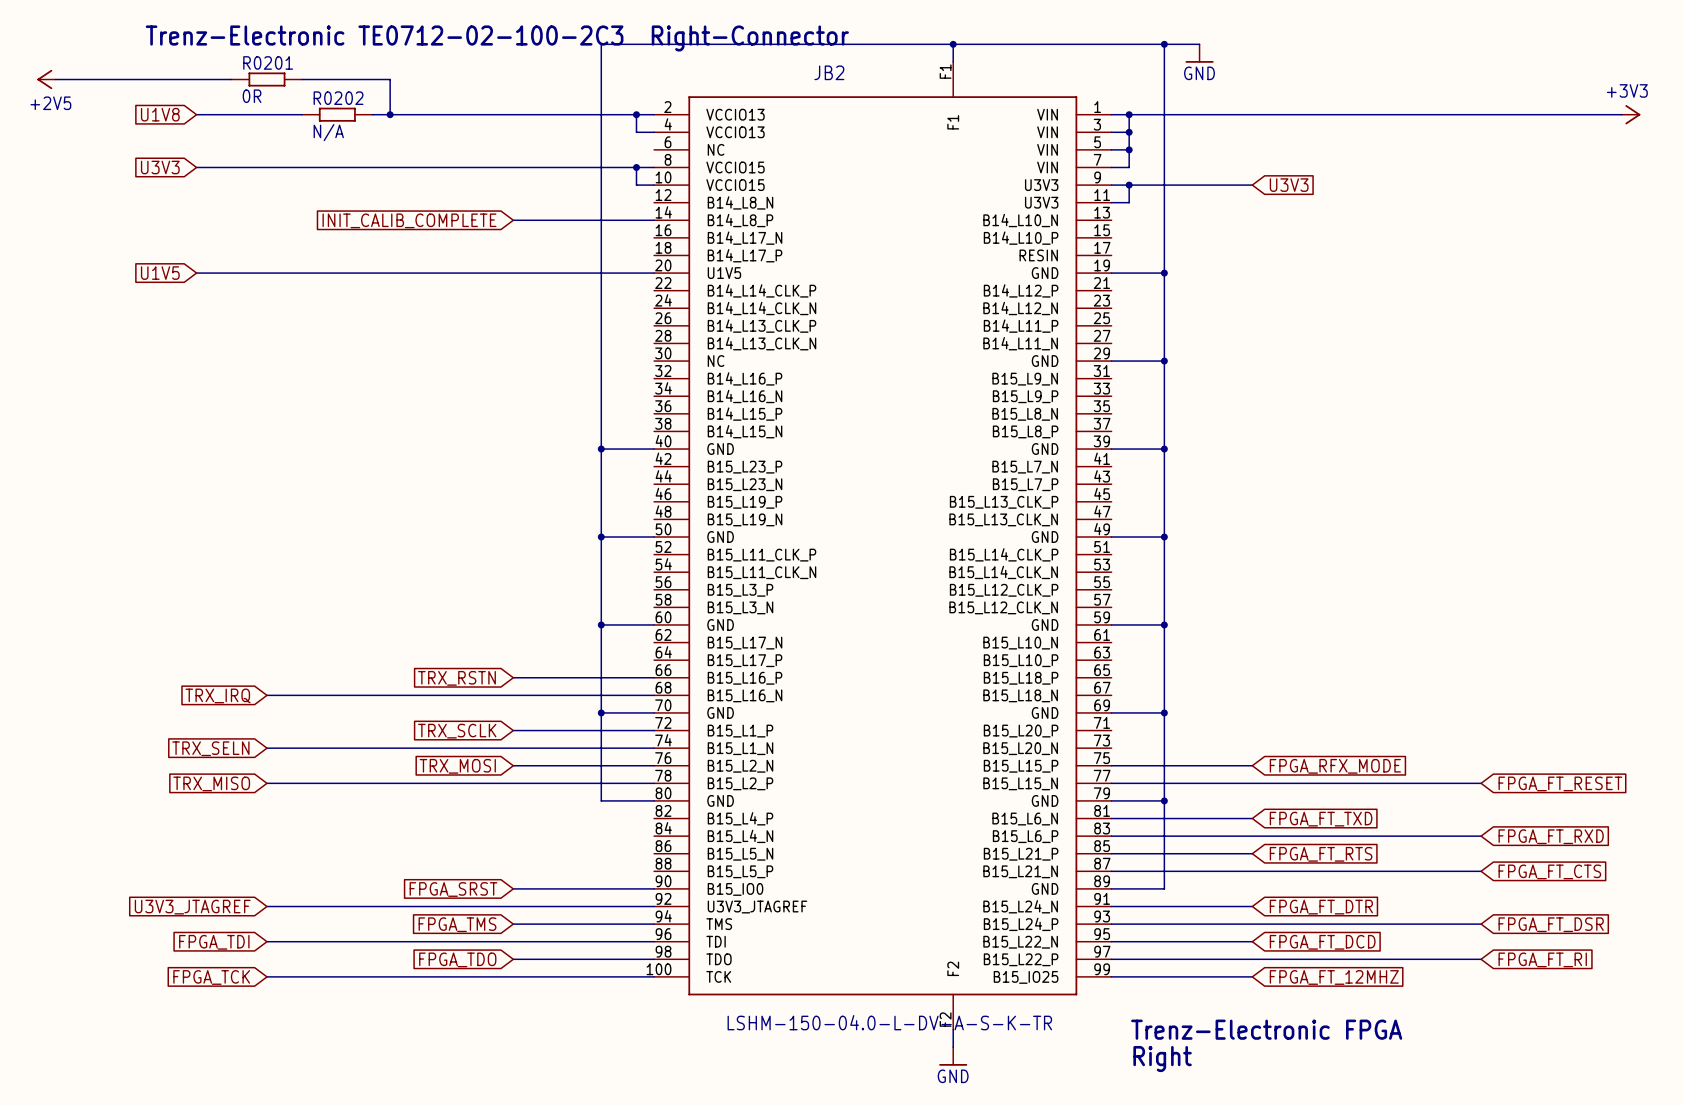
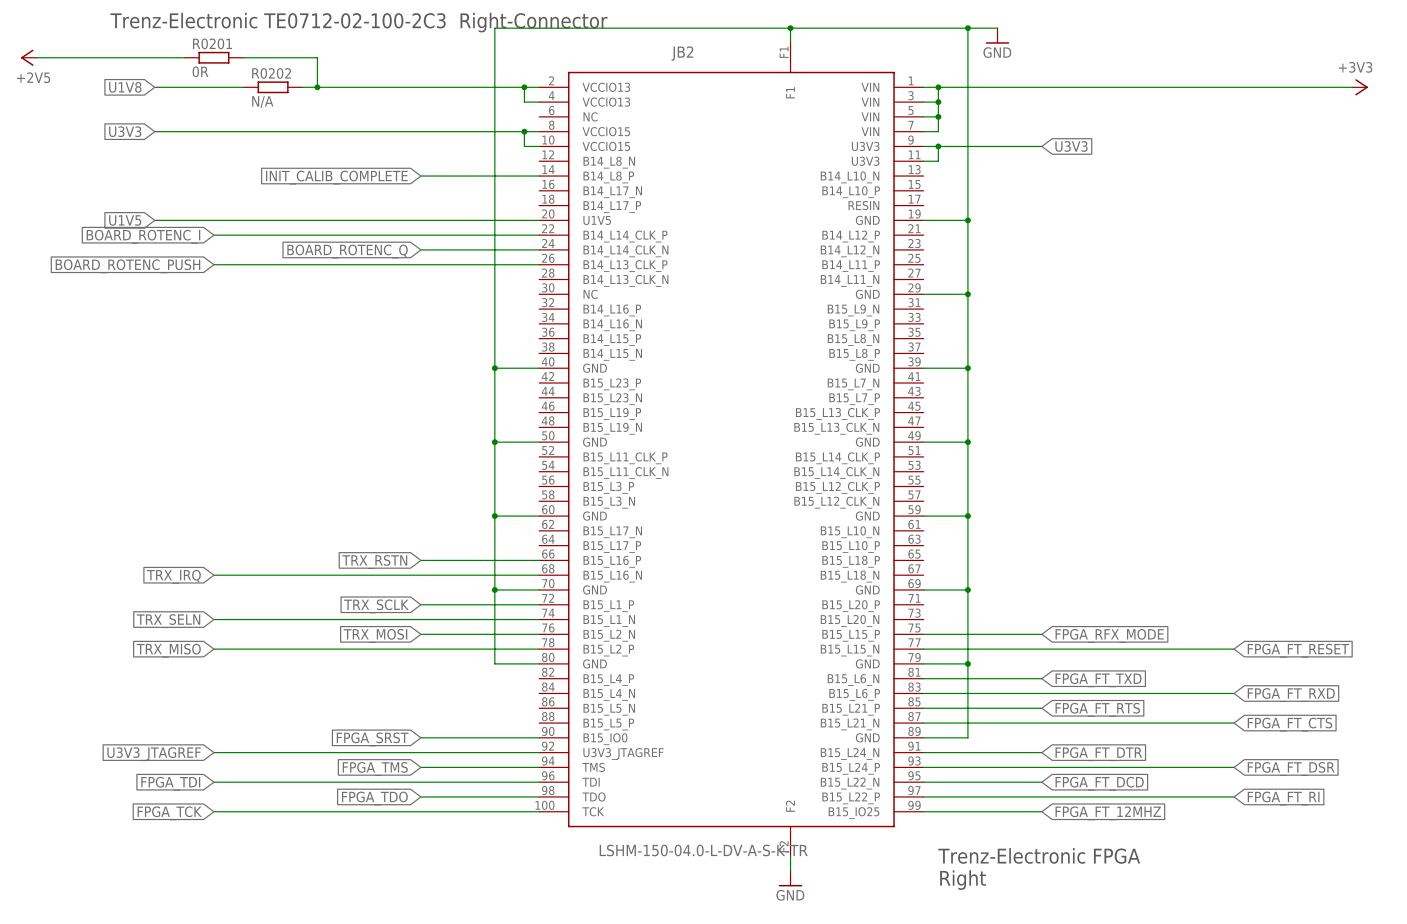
wire: none -> (213, 235) (539, 235)
global label: none -> BOARD_ROTENC_I (143, 236)
global label: none -> BOARD_ROTENC_Q (347, 251)
wire: none -> (420, 249) (539, 249)
wire: none -> (213, 264) (539, 264)
global label: none -> BOARD_ROTENC_PUSH (127, 266)

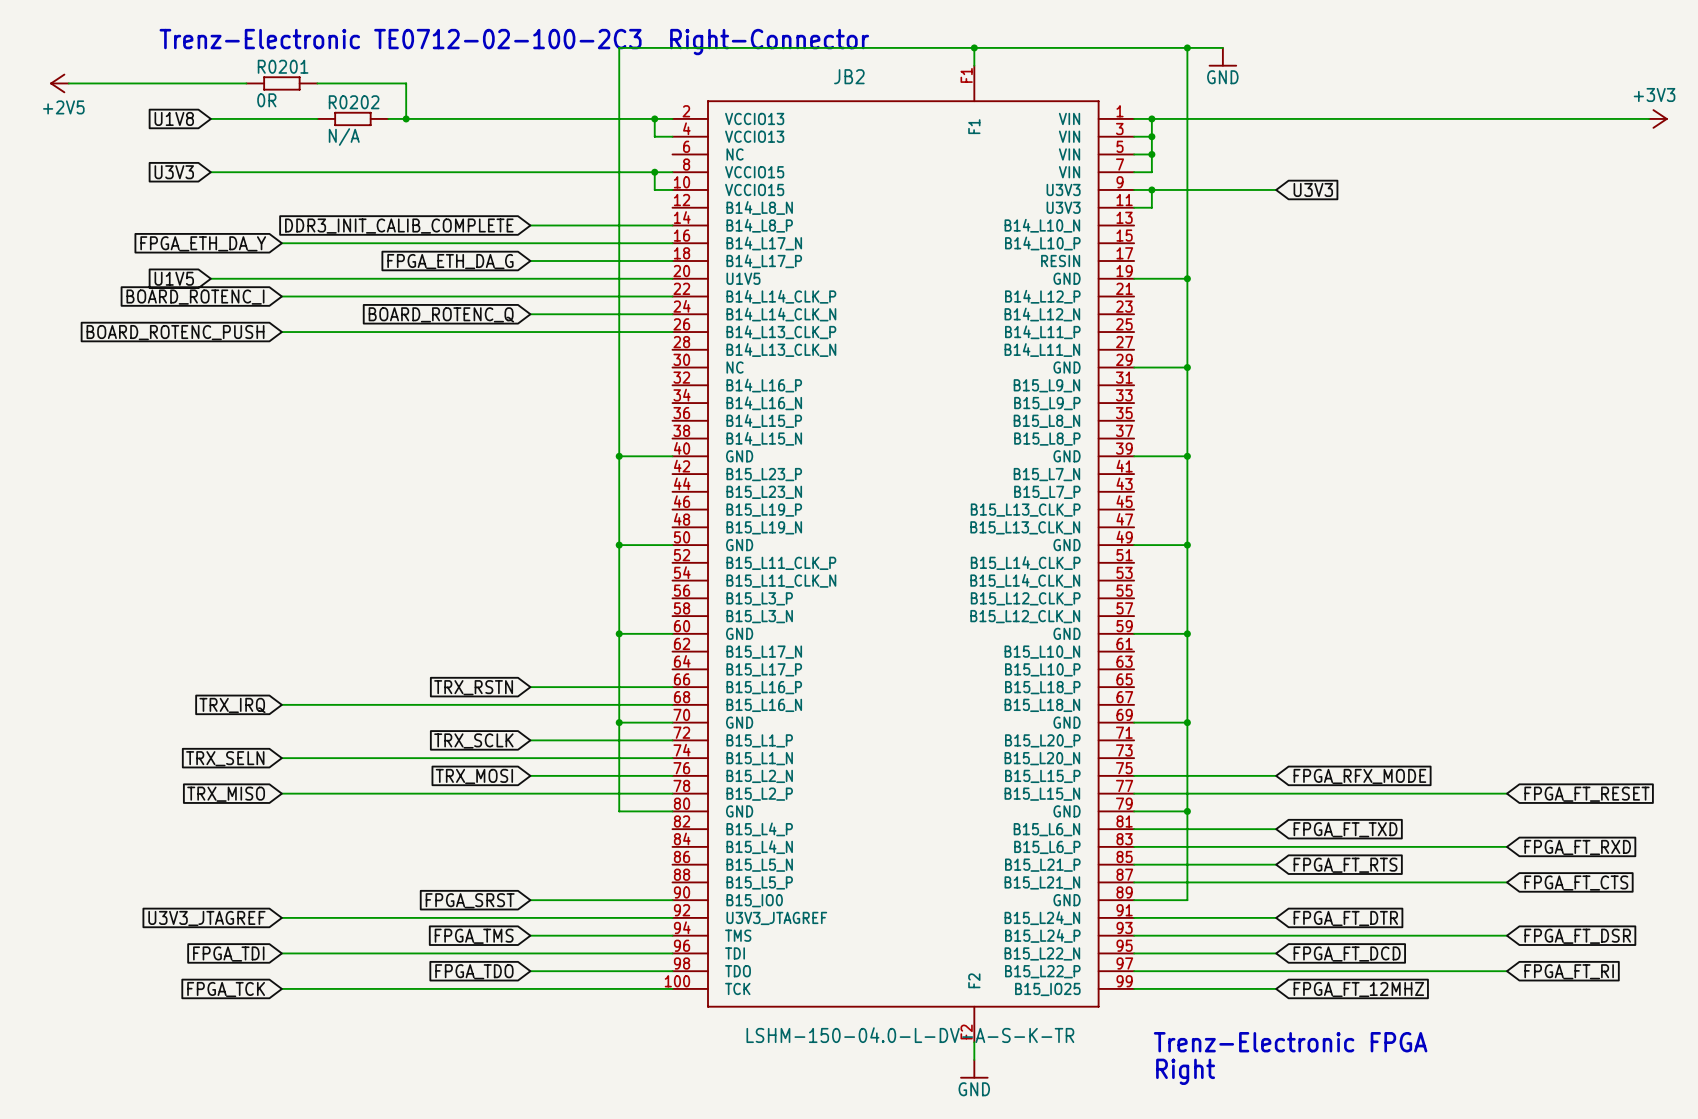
global label: INIT_CALIB_COMPLETE (336, 177) -> DDR3_INIT_CALIB_COMPLETE (399, 226)
wire: none -> (281, 243) (672, 243)
global label: none -> FPGA_ETH_DA_Y (203, 243)
wire: none -> (530, 261) (672, 261)
global label: none -> FPGA_ETH_DA_G (450, 261)

